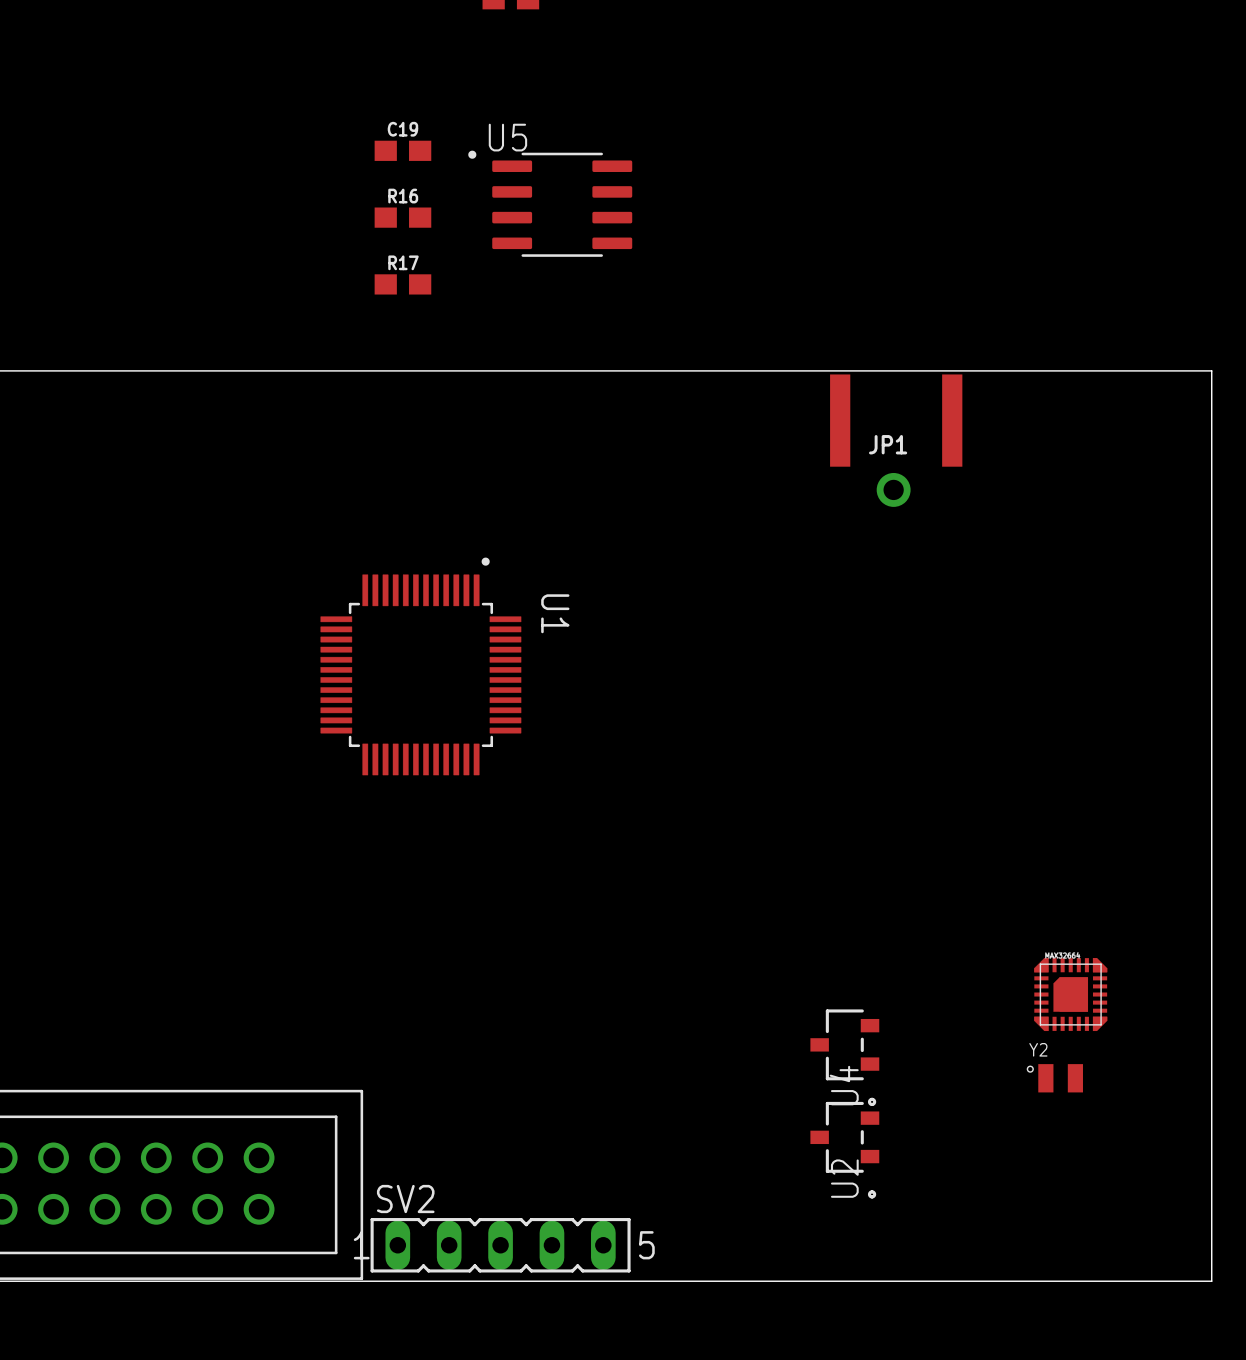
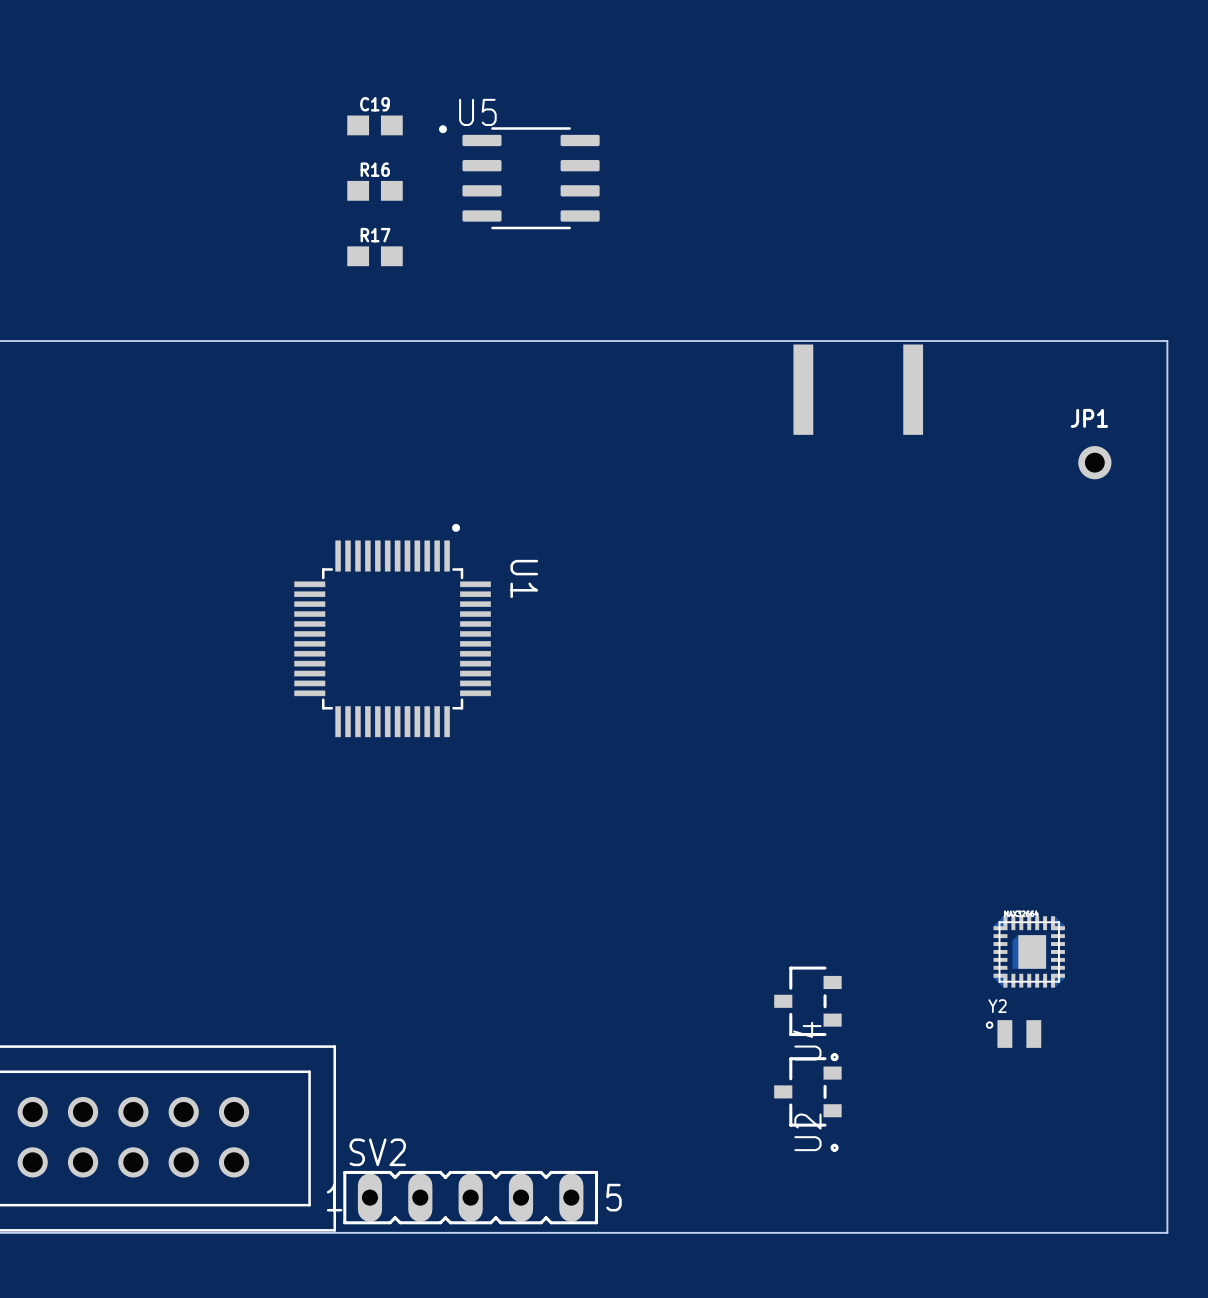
JP1 position: (893, 489) -> (1094, 462)

